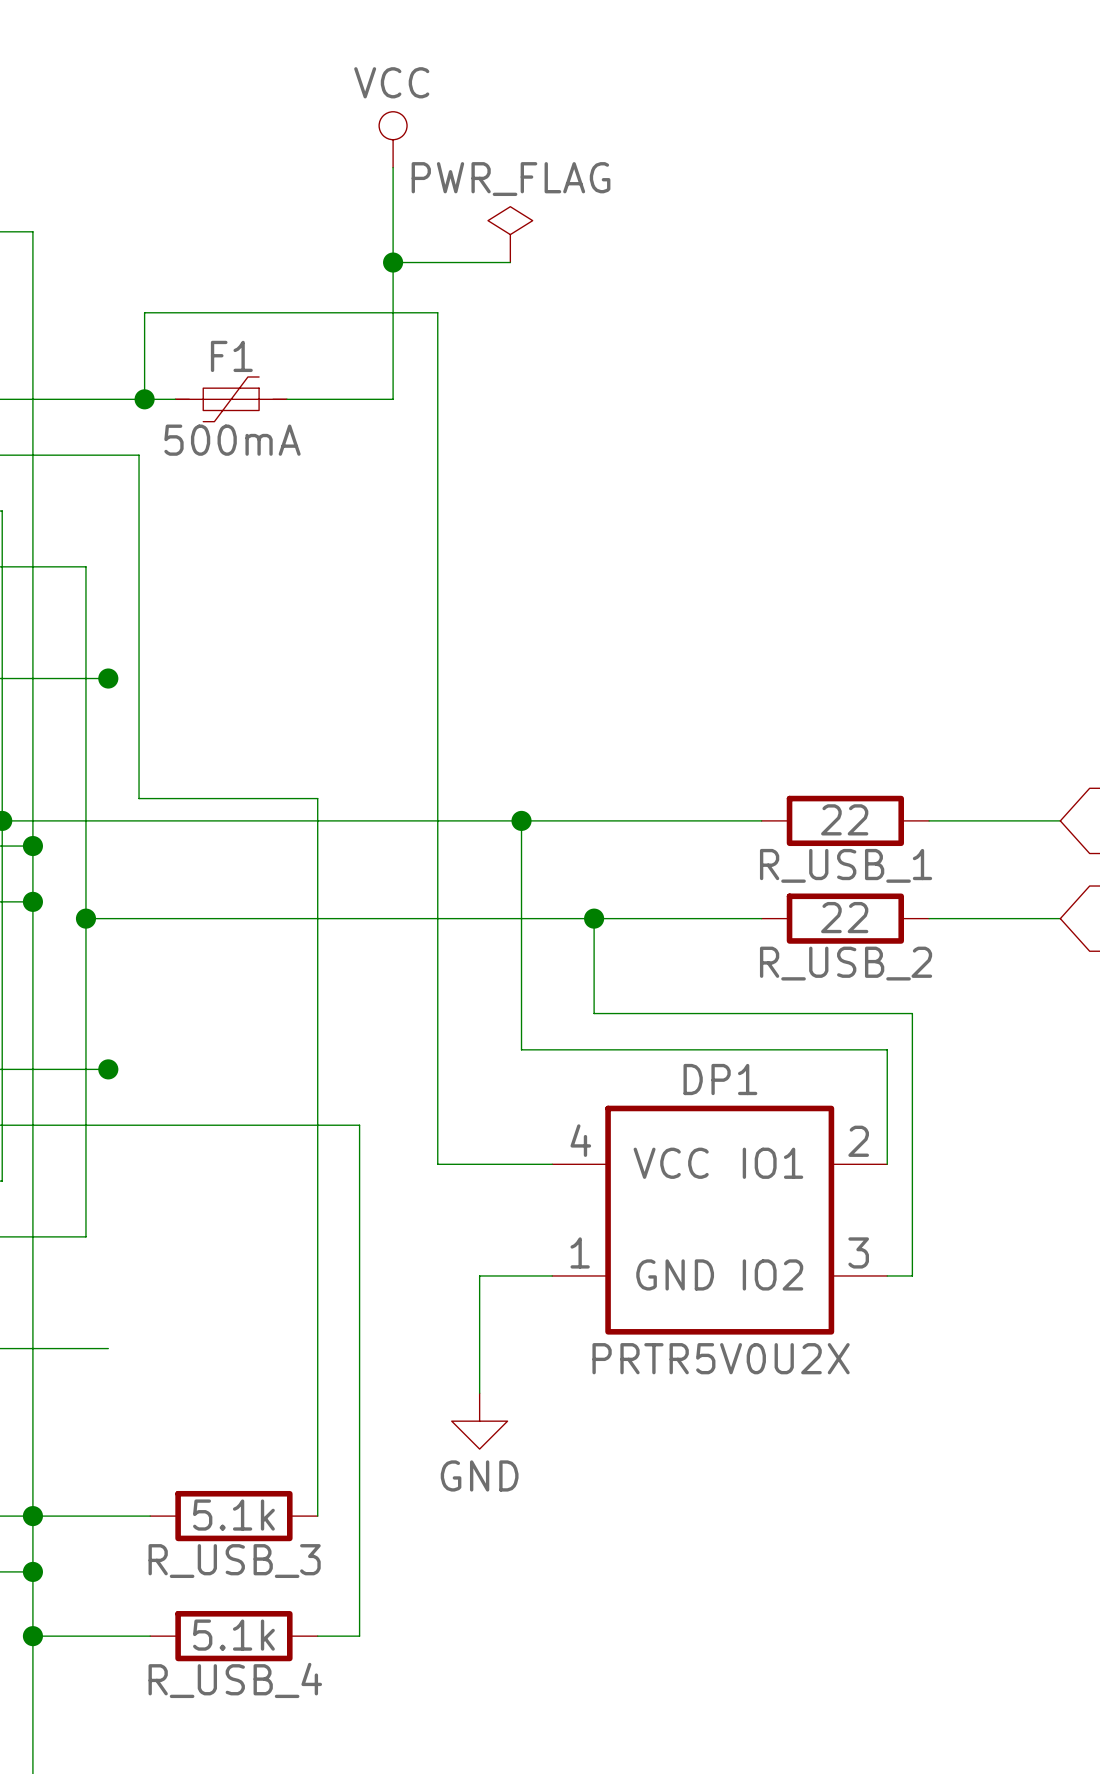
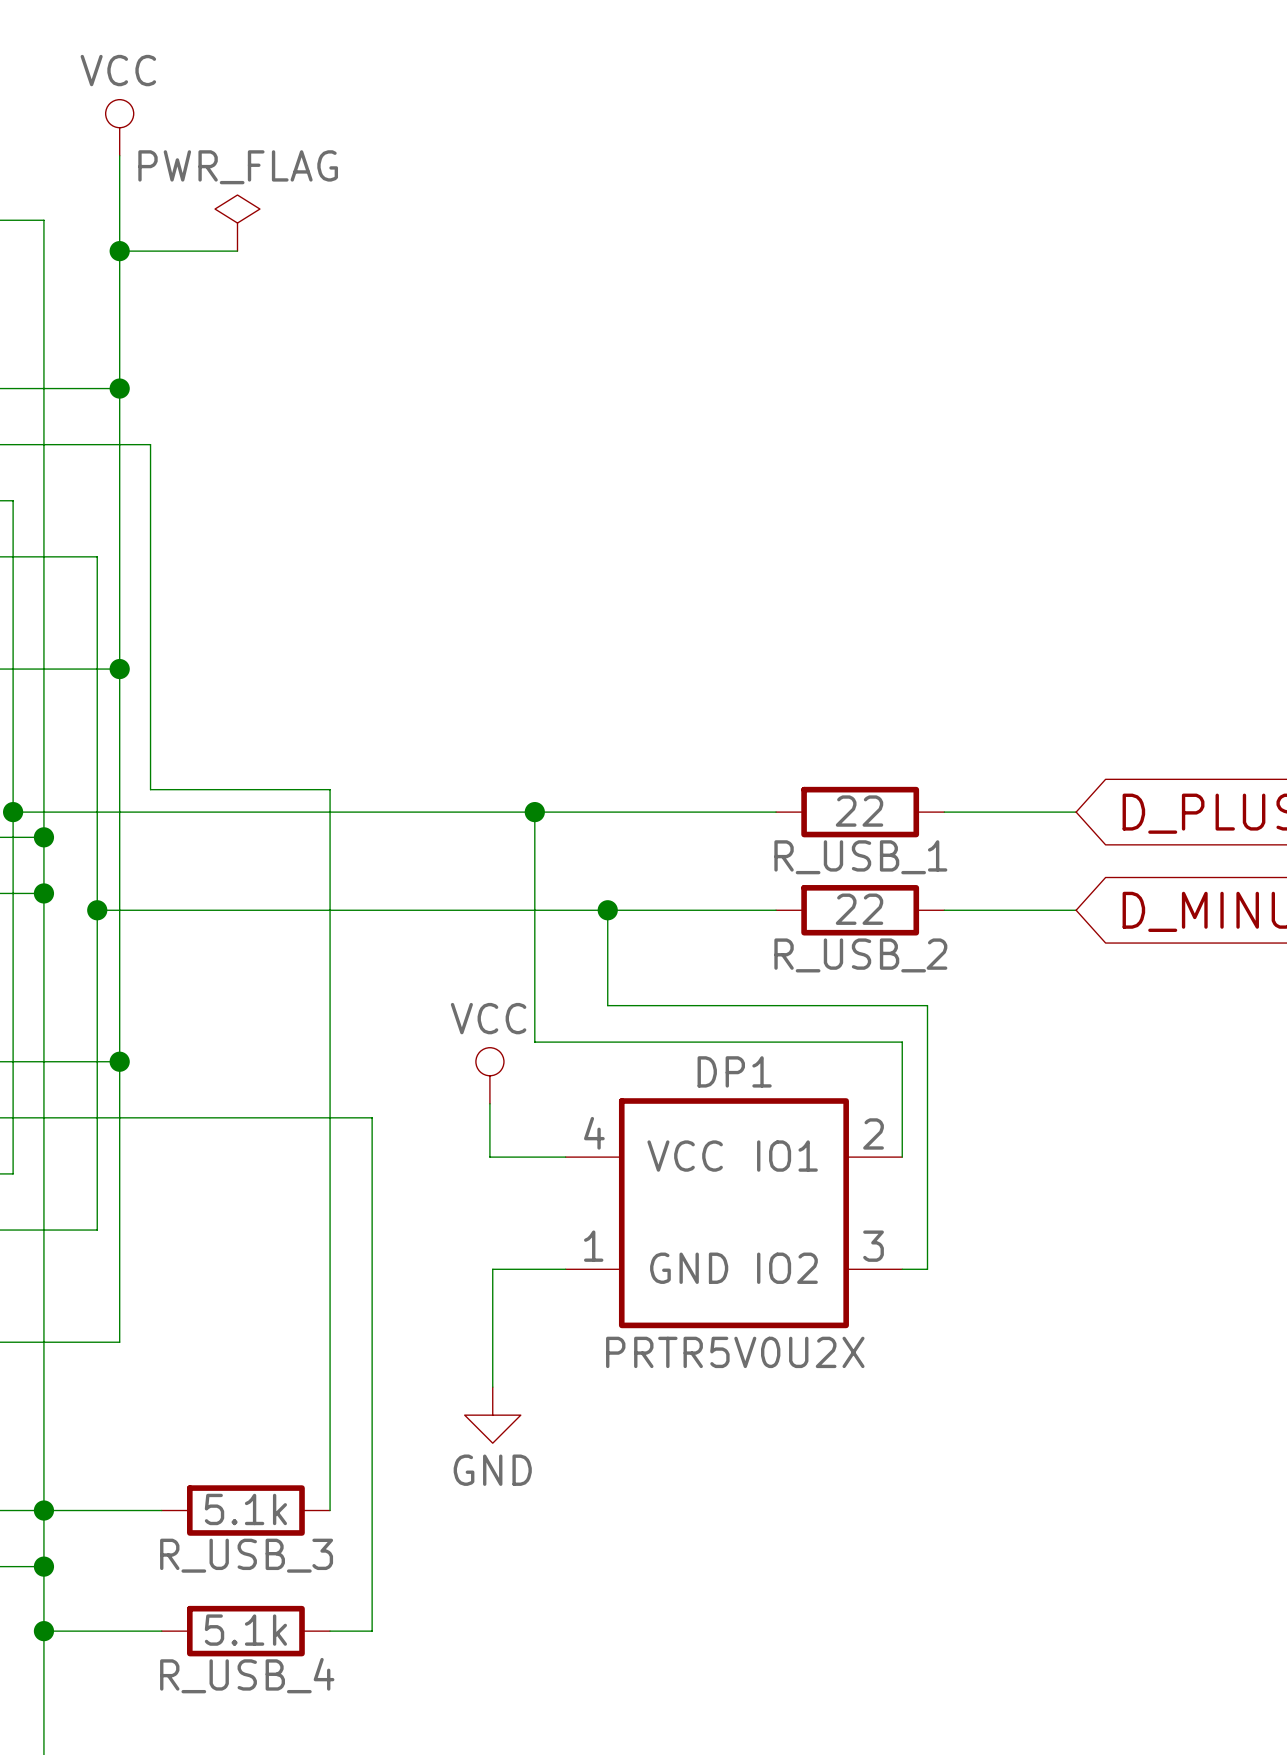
power symbol position: VCC (393, 139) -> VCC (119, 127)
wire: none -> (119, 155) (119, 1342)
wire: (393, 167) (393, 399) (286, 399) -> none
power symbol position: PWR_FLAG (510, 234) -> PWR_FLAG (237, 223)
junction: none -> (119, 251)
wire: (393, 262) (510, 262) -> (119, 251) (237, 251)
junction: (393, 262) -> none
wire: (108, 399) (175, 399) -> none
wire: (144, 399) (144, 312) (437, 312) (437, 1164) (476, 1164) -> (489, 1103) (489, 1157)
junction position: (144, 399) -> (119, 388)
F1: 500mA (231, 399) -> none
power symbol: none -> VCC (489, 1075)

